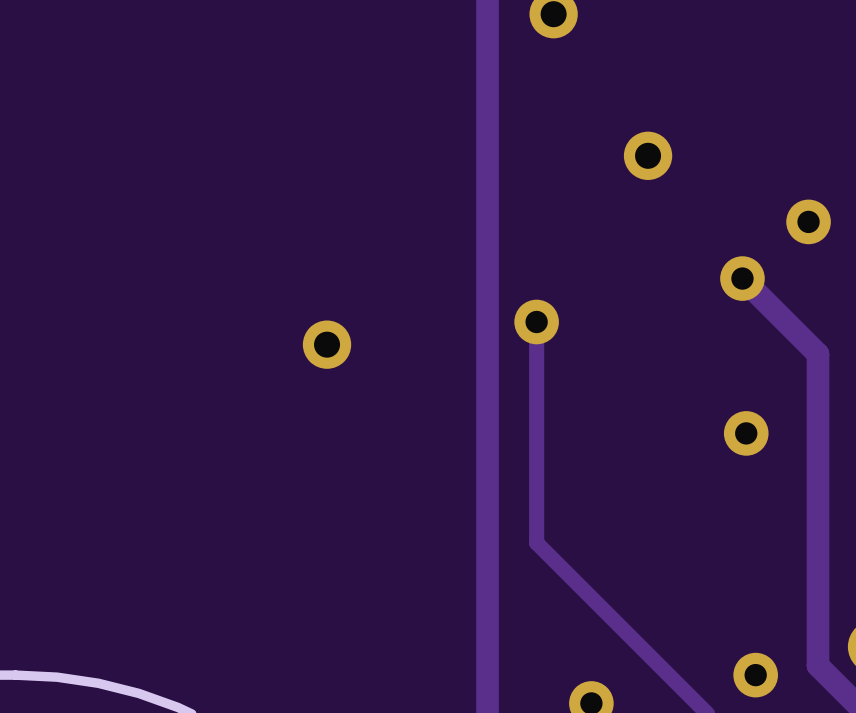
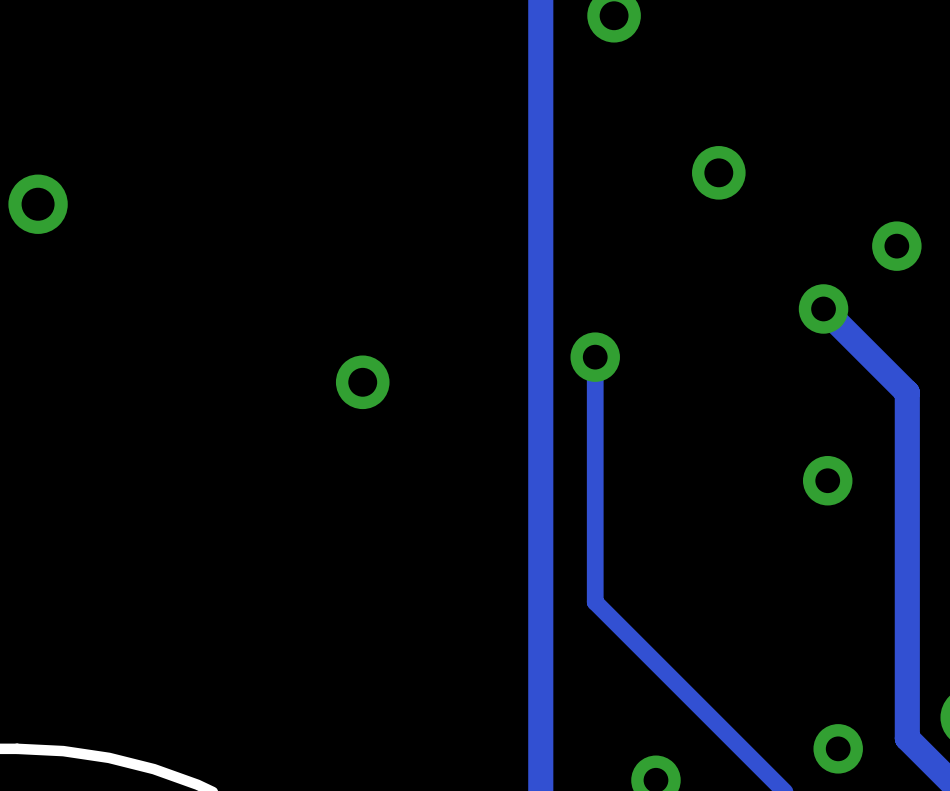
via: none -> (38, 204)

